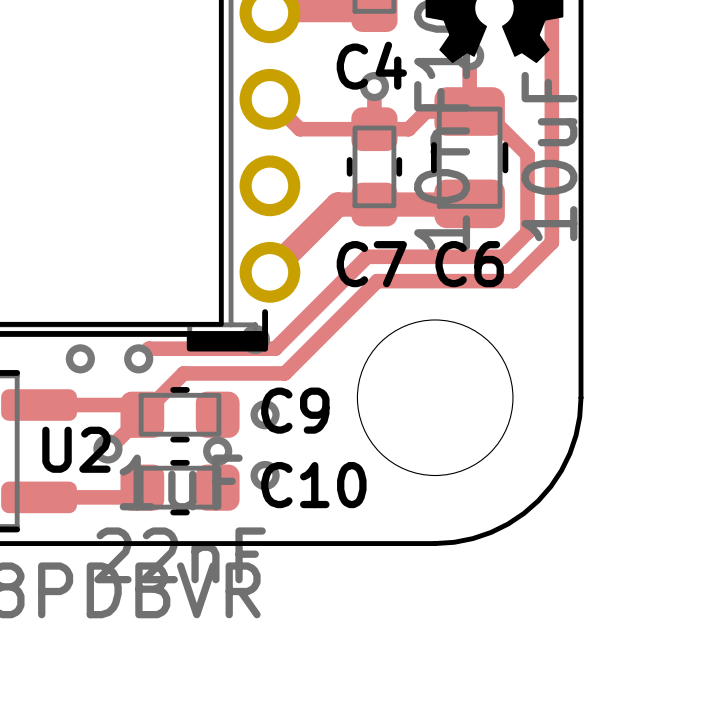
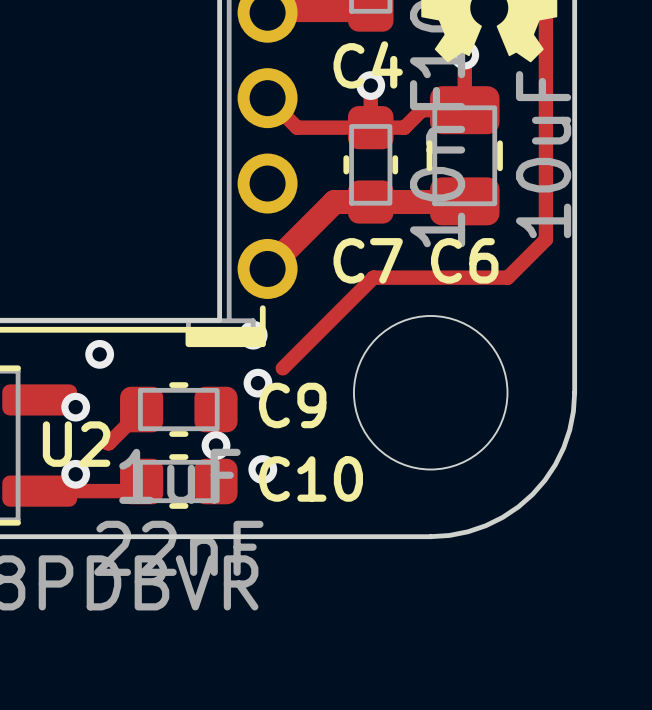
track: (469, 111) (484, 111) (527, 154) (527, 232) (503, 256) (367, 256) (275, 348) (148, 348) (138, 358) -> none
via position: (80, 358) -> (99, 354)
via: (138, 358) -> none
track: (284, 373) (183, 373) (142, 414) (132, 405) (39, 405) -> none
via: none -> (75, 407)
via position: (265, 414) -> (257, 383)
via: (107, 448) -> none
via: none -> (75, 474)

